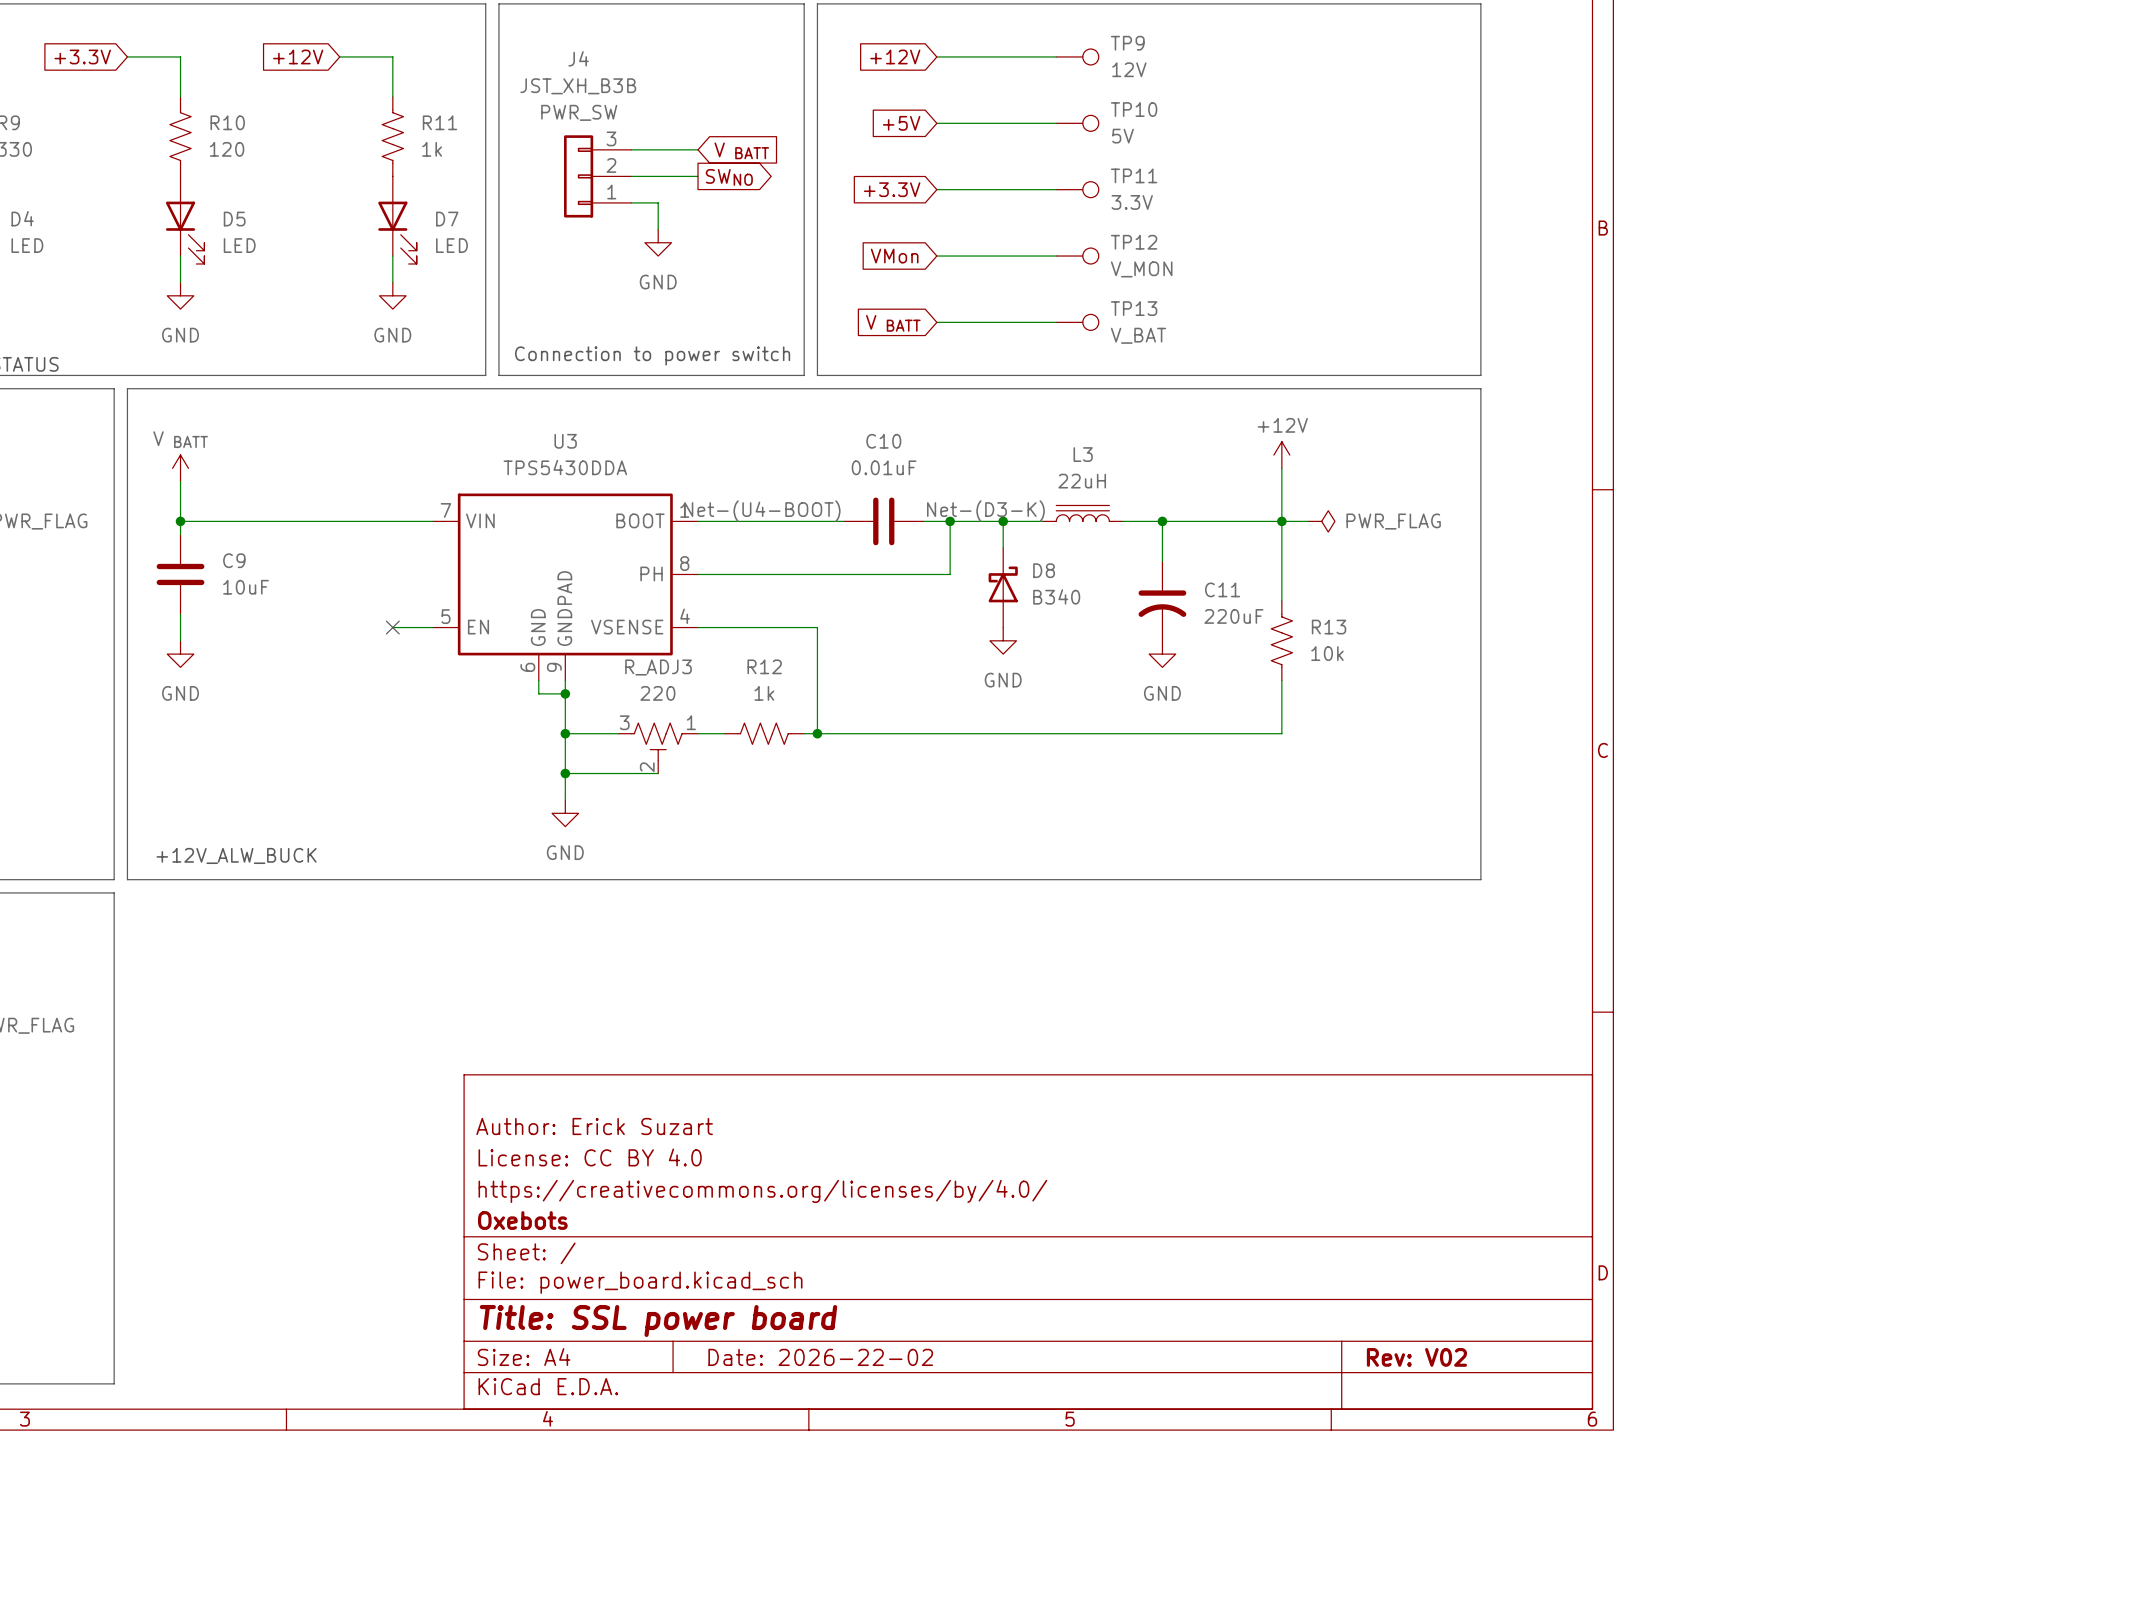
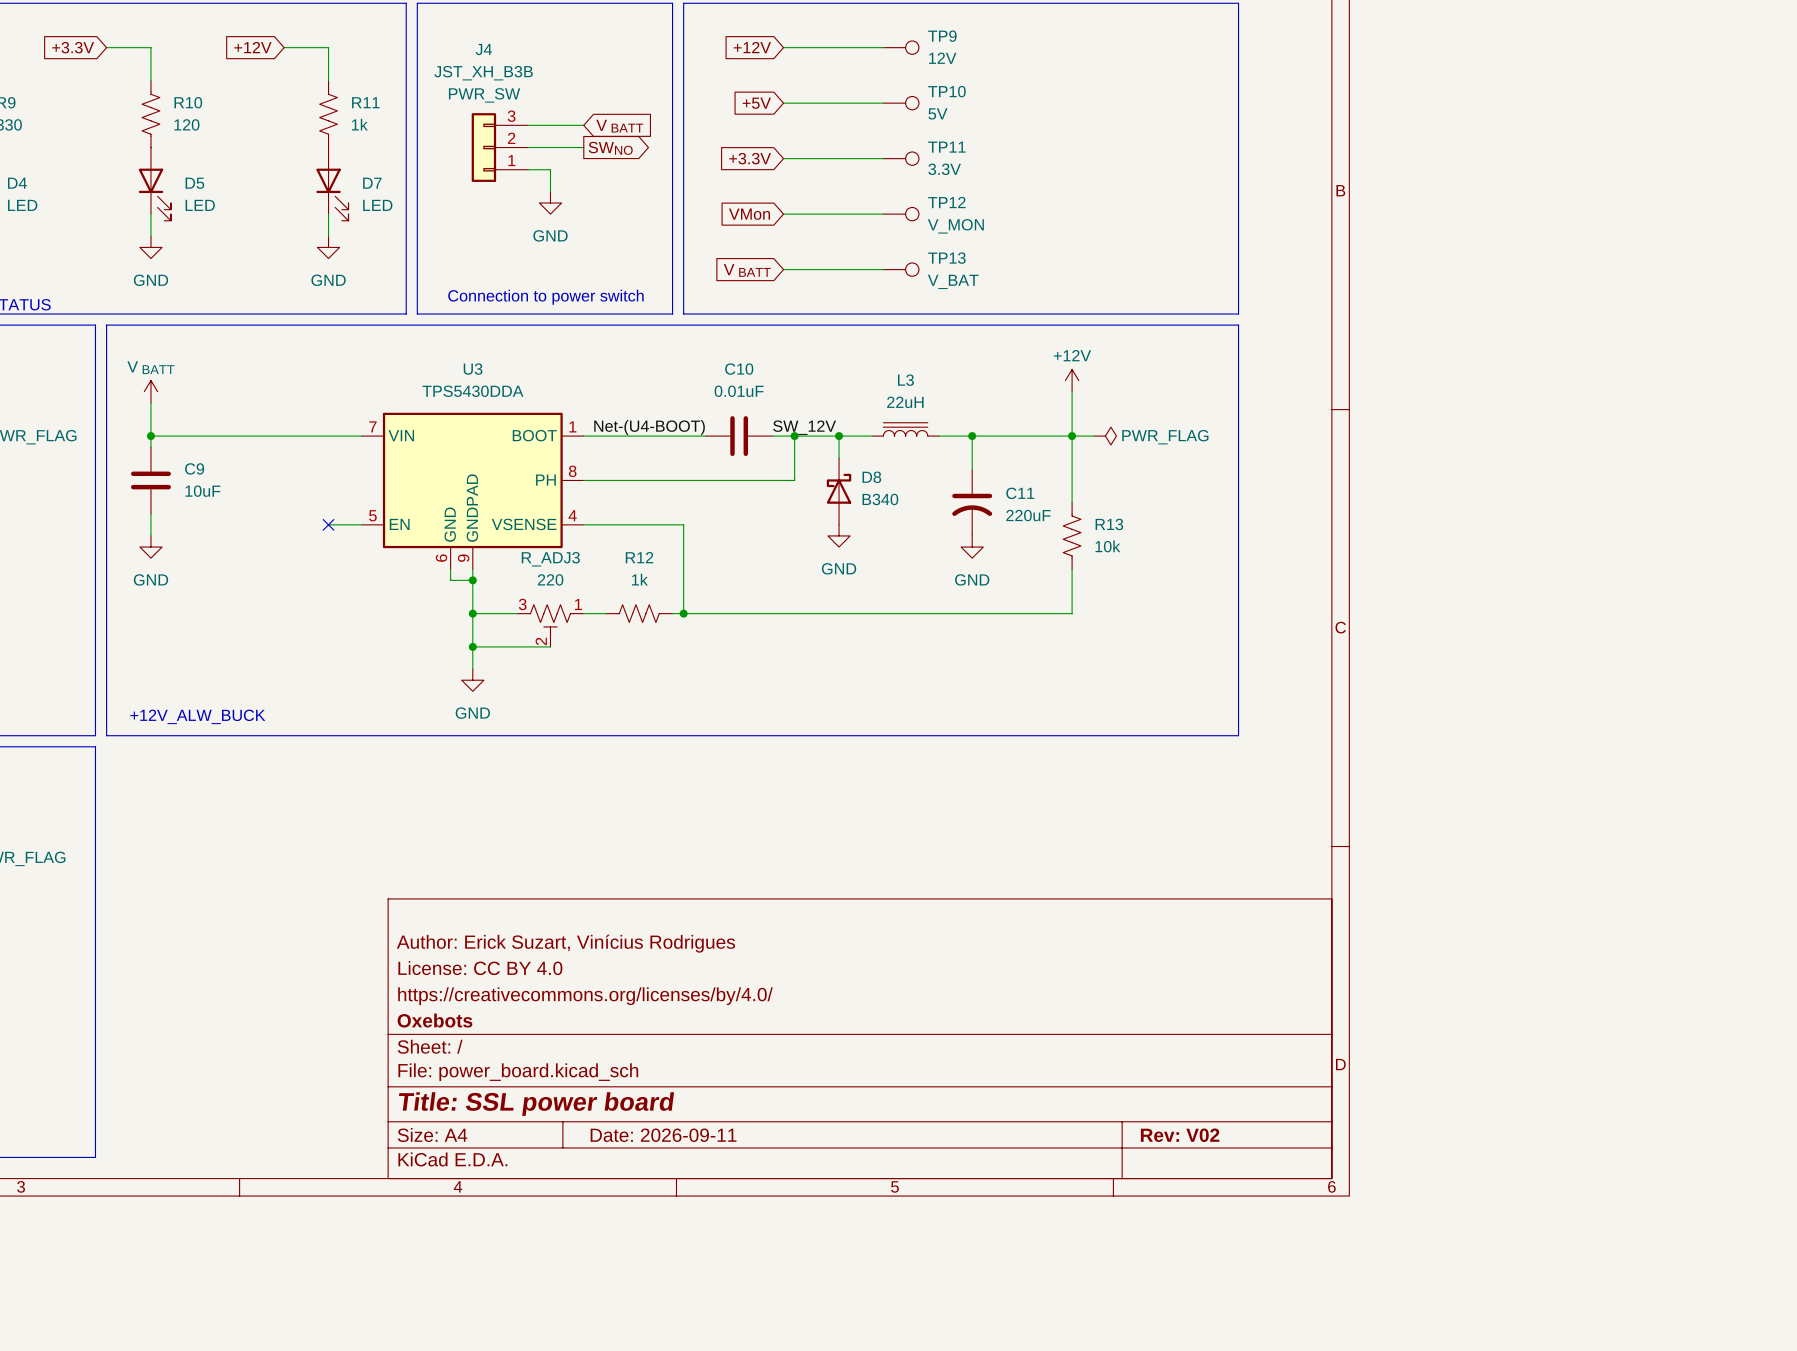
label: Net-(D3-K) (985, 511) -> SW_12V (804, 427)
title block: Author: Erick Suzart (594, 1126) -> Author: Erick Suzart, Vinícius Rodrigues (565, 943)
title block: Date: 2026-22-02 (820, 1357) -> Date: 2026-09-11 (663, 1135)

